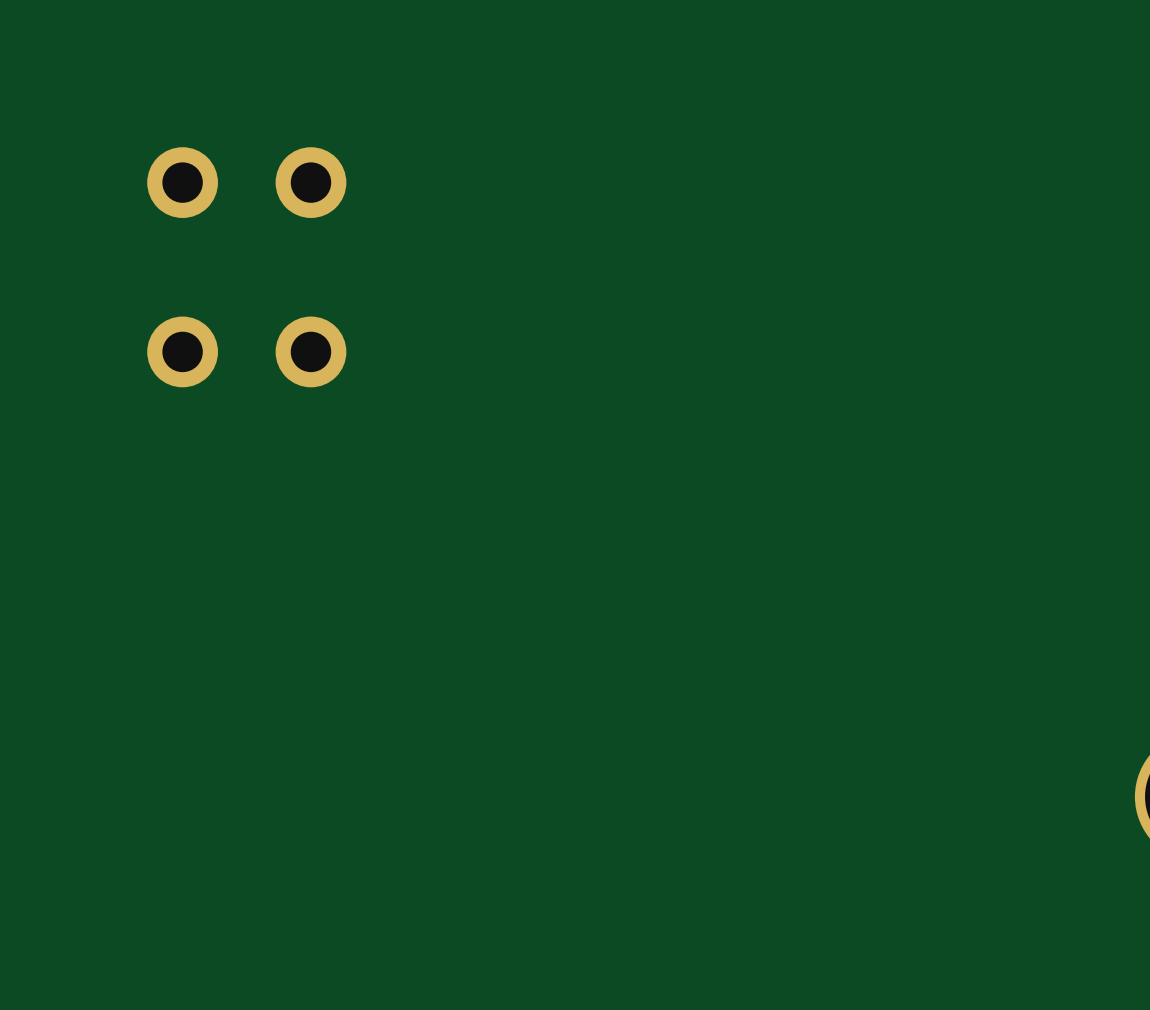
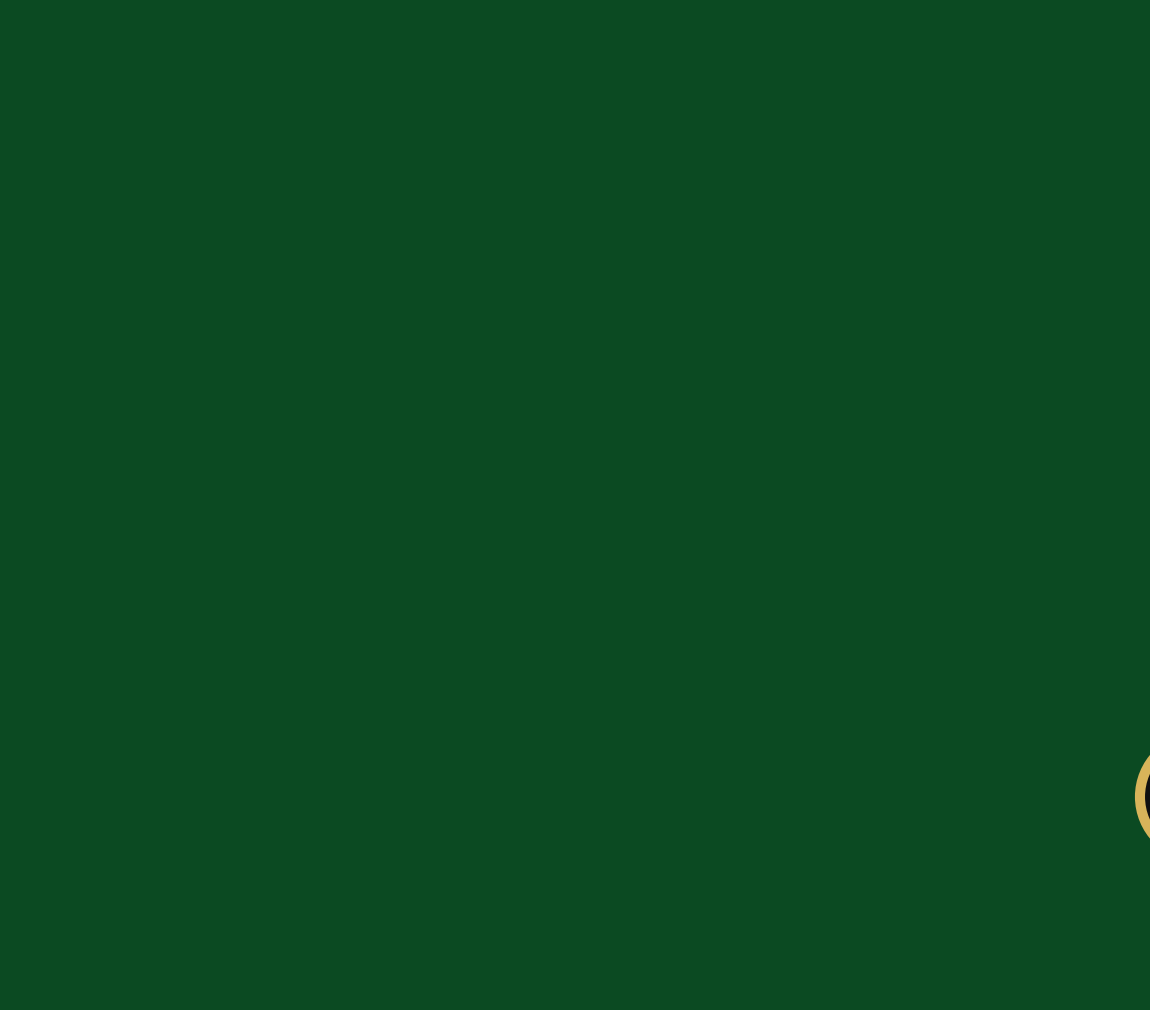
part: (246, 182) -> none
part: (246, 351) -> none

